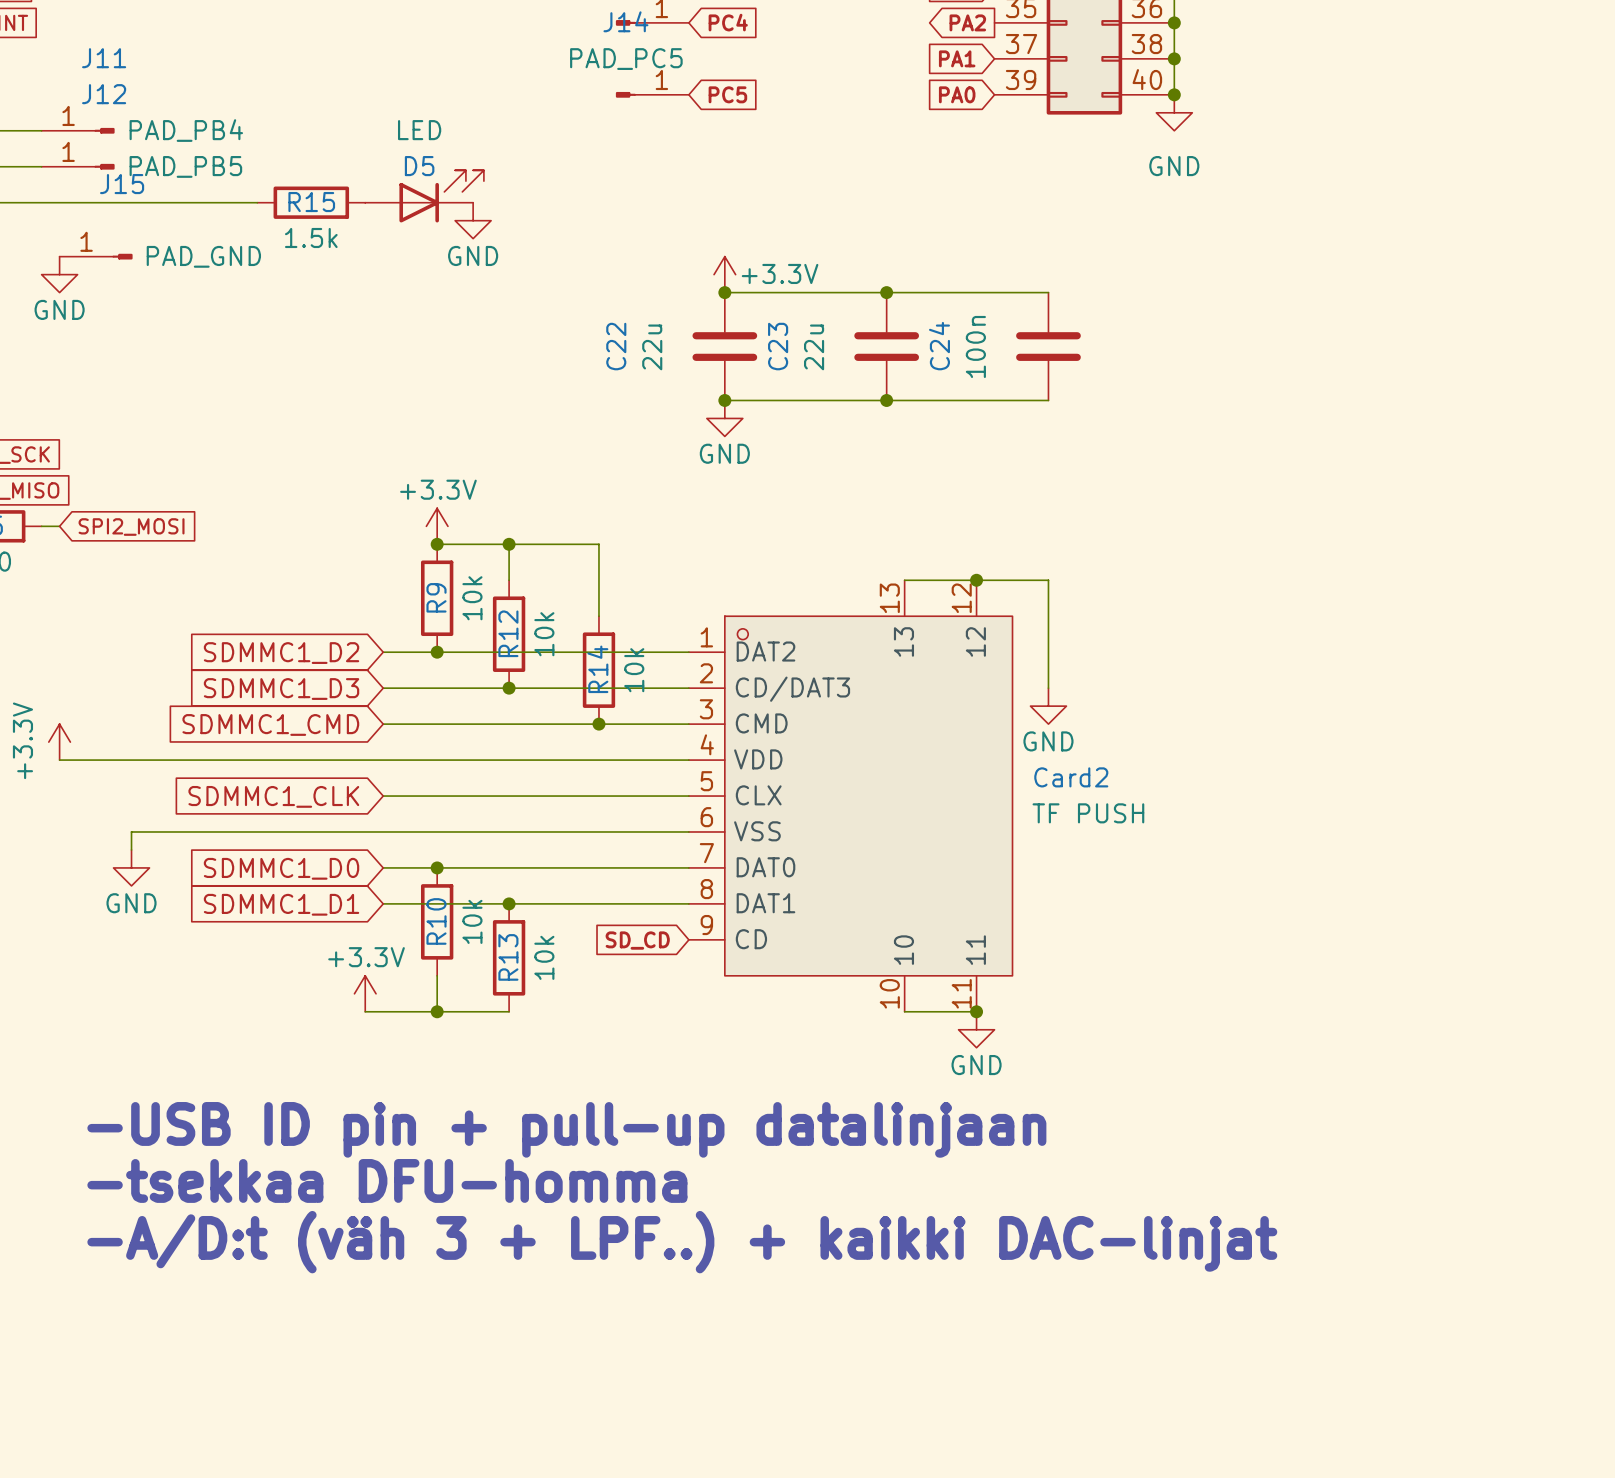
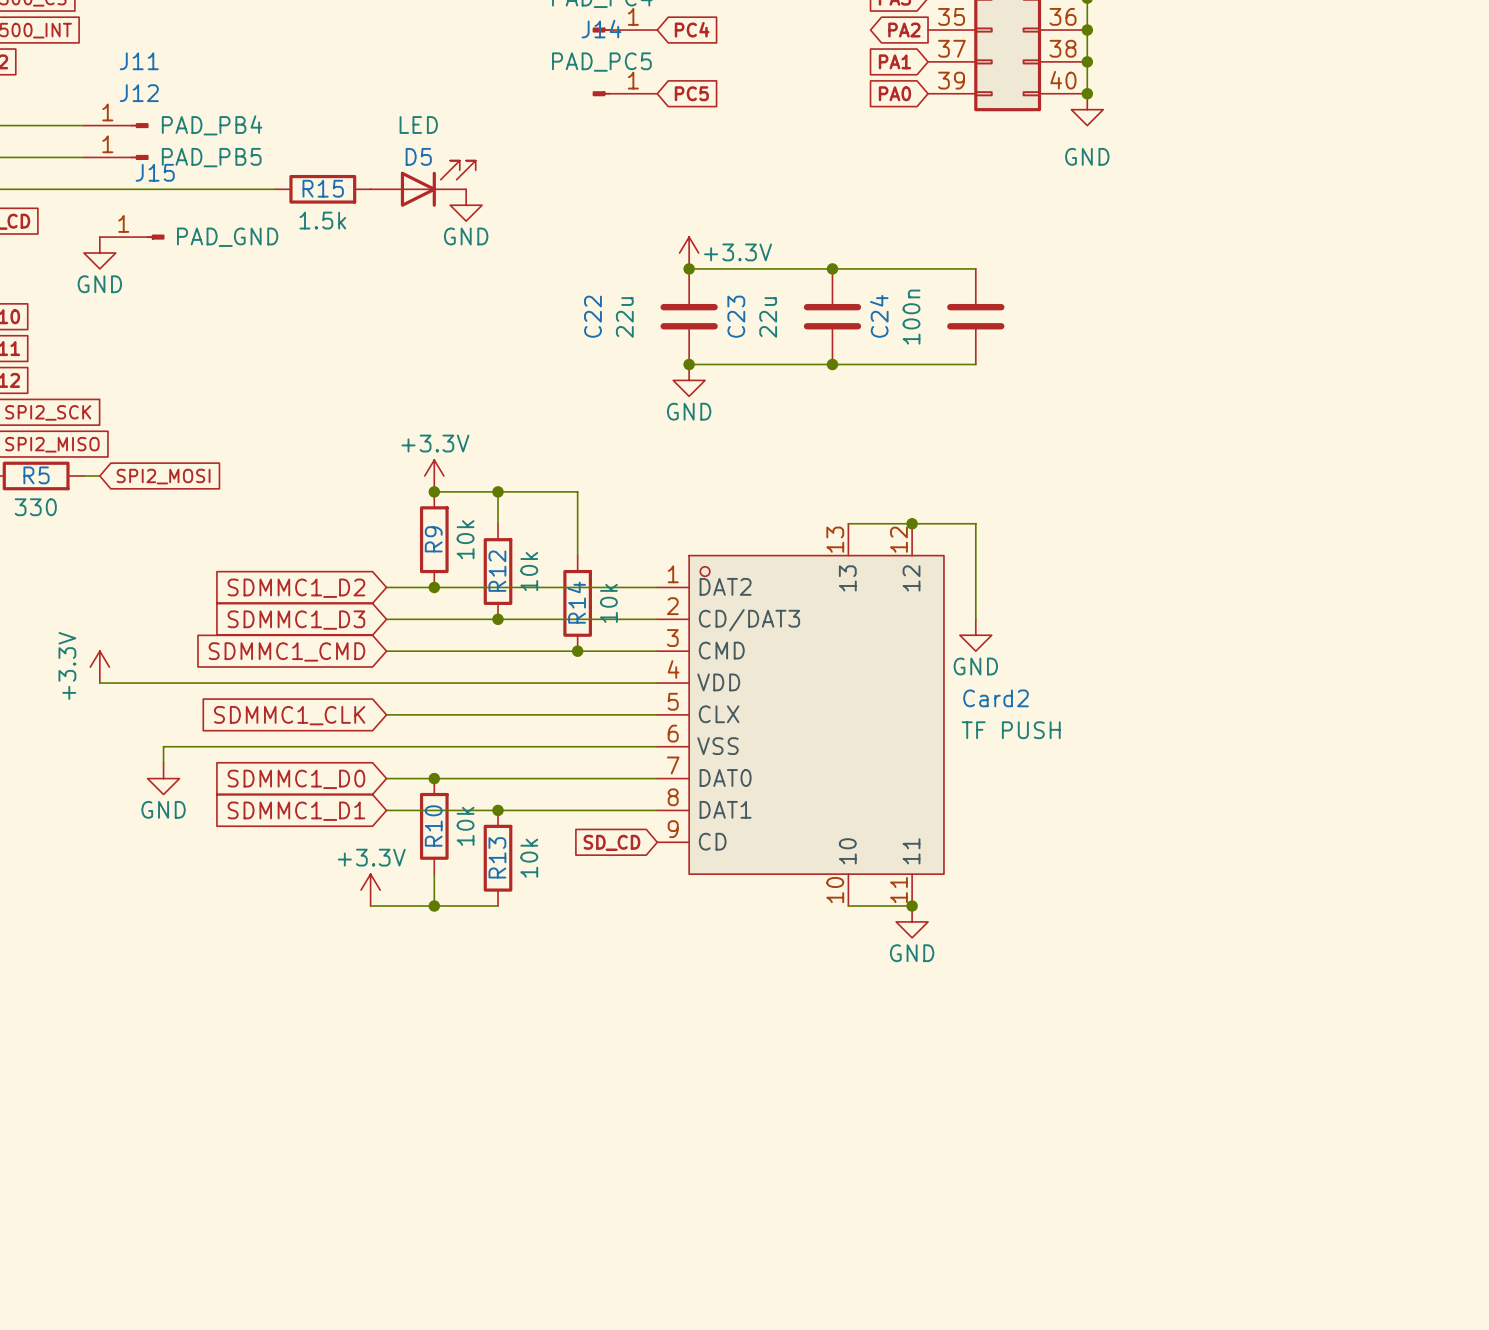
text: -USB ID pin + pull-up datalinjaan (566, 1129) -> none
text: -tsekkaa DFU-homma (387, 1180) -> none
text: -A/D:t (väh 3 + LPF..) + kaikki DAC-linjat (682, 1242) -> none

